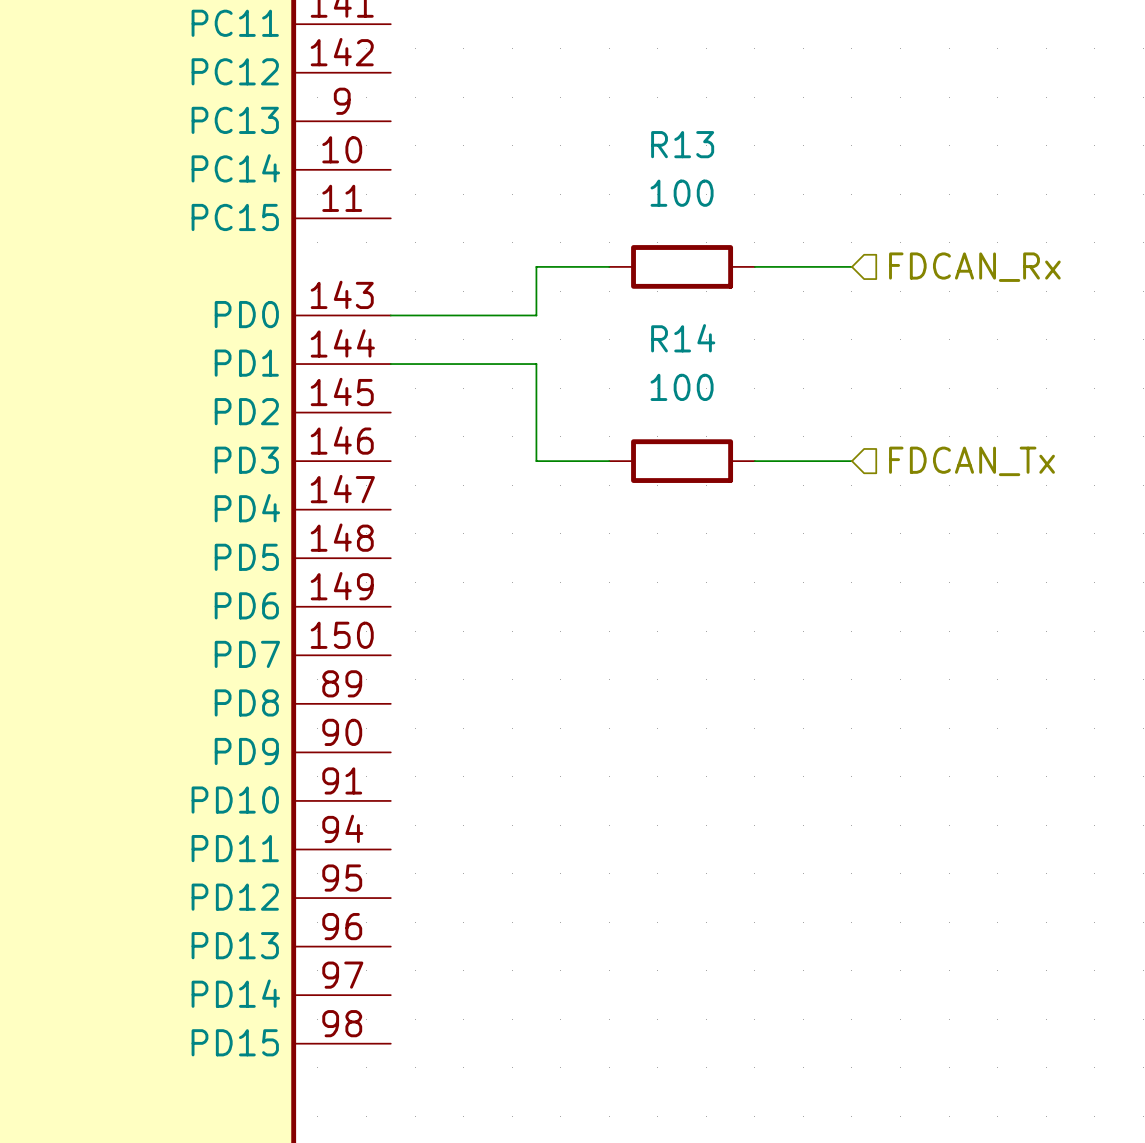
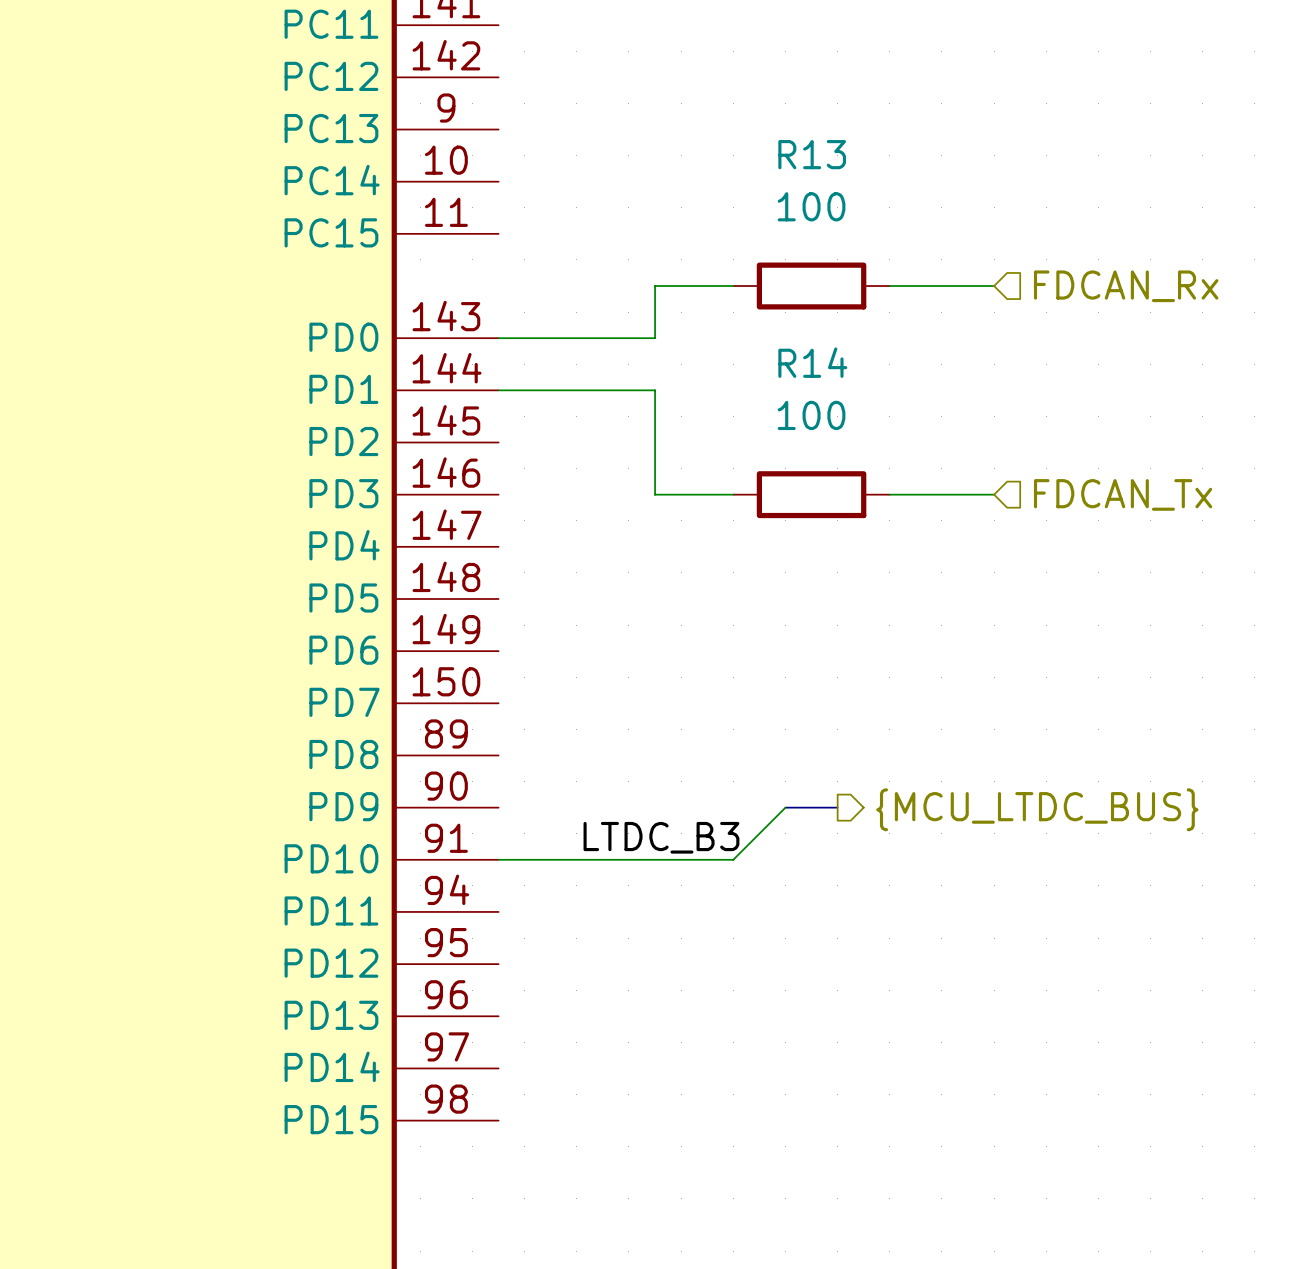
wire: none -> (785, 807) (733, 859) (498, 859)
bus: none -> (785, 807) (837, 807)
hierarchical label: none -> {MCU_LTDC_BUS} (1037, 809)
label: none -> LTDC_B3 (661, 837)

